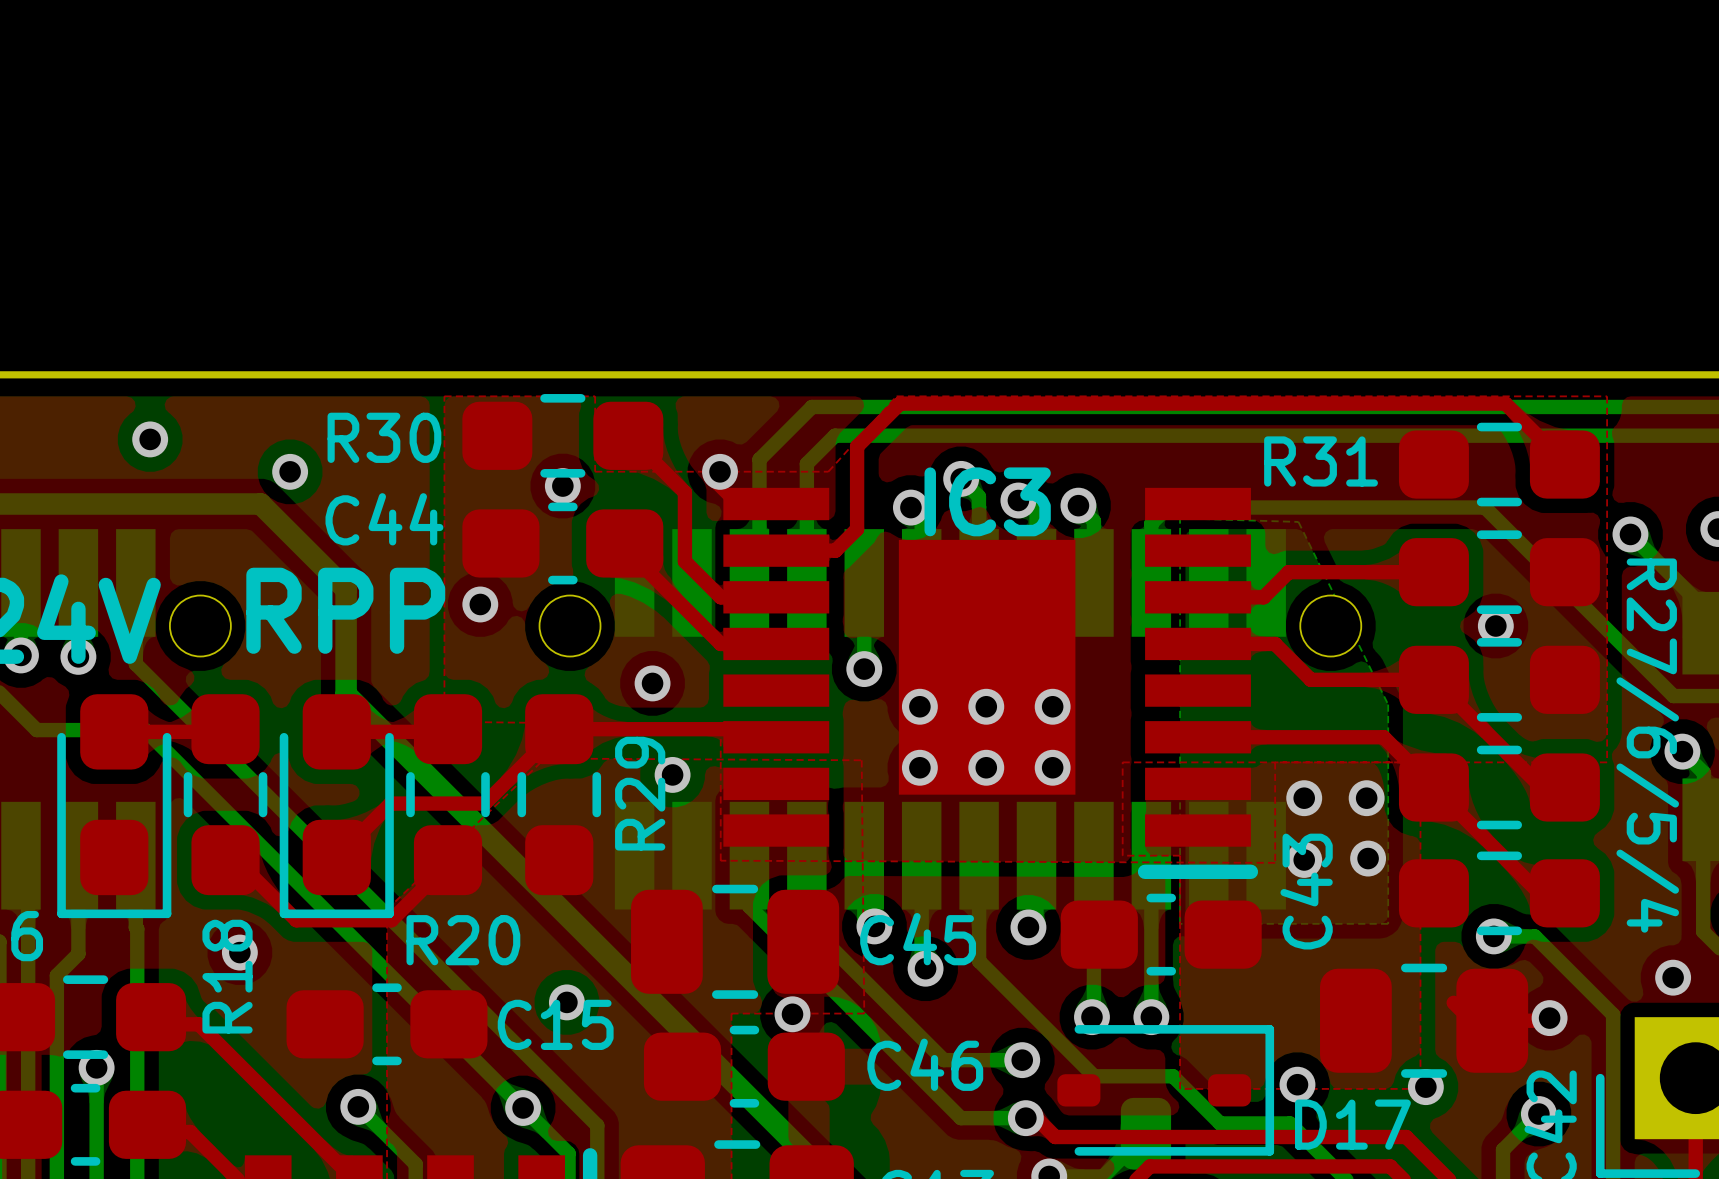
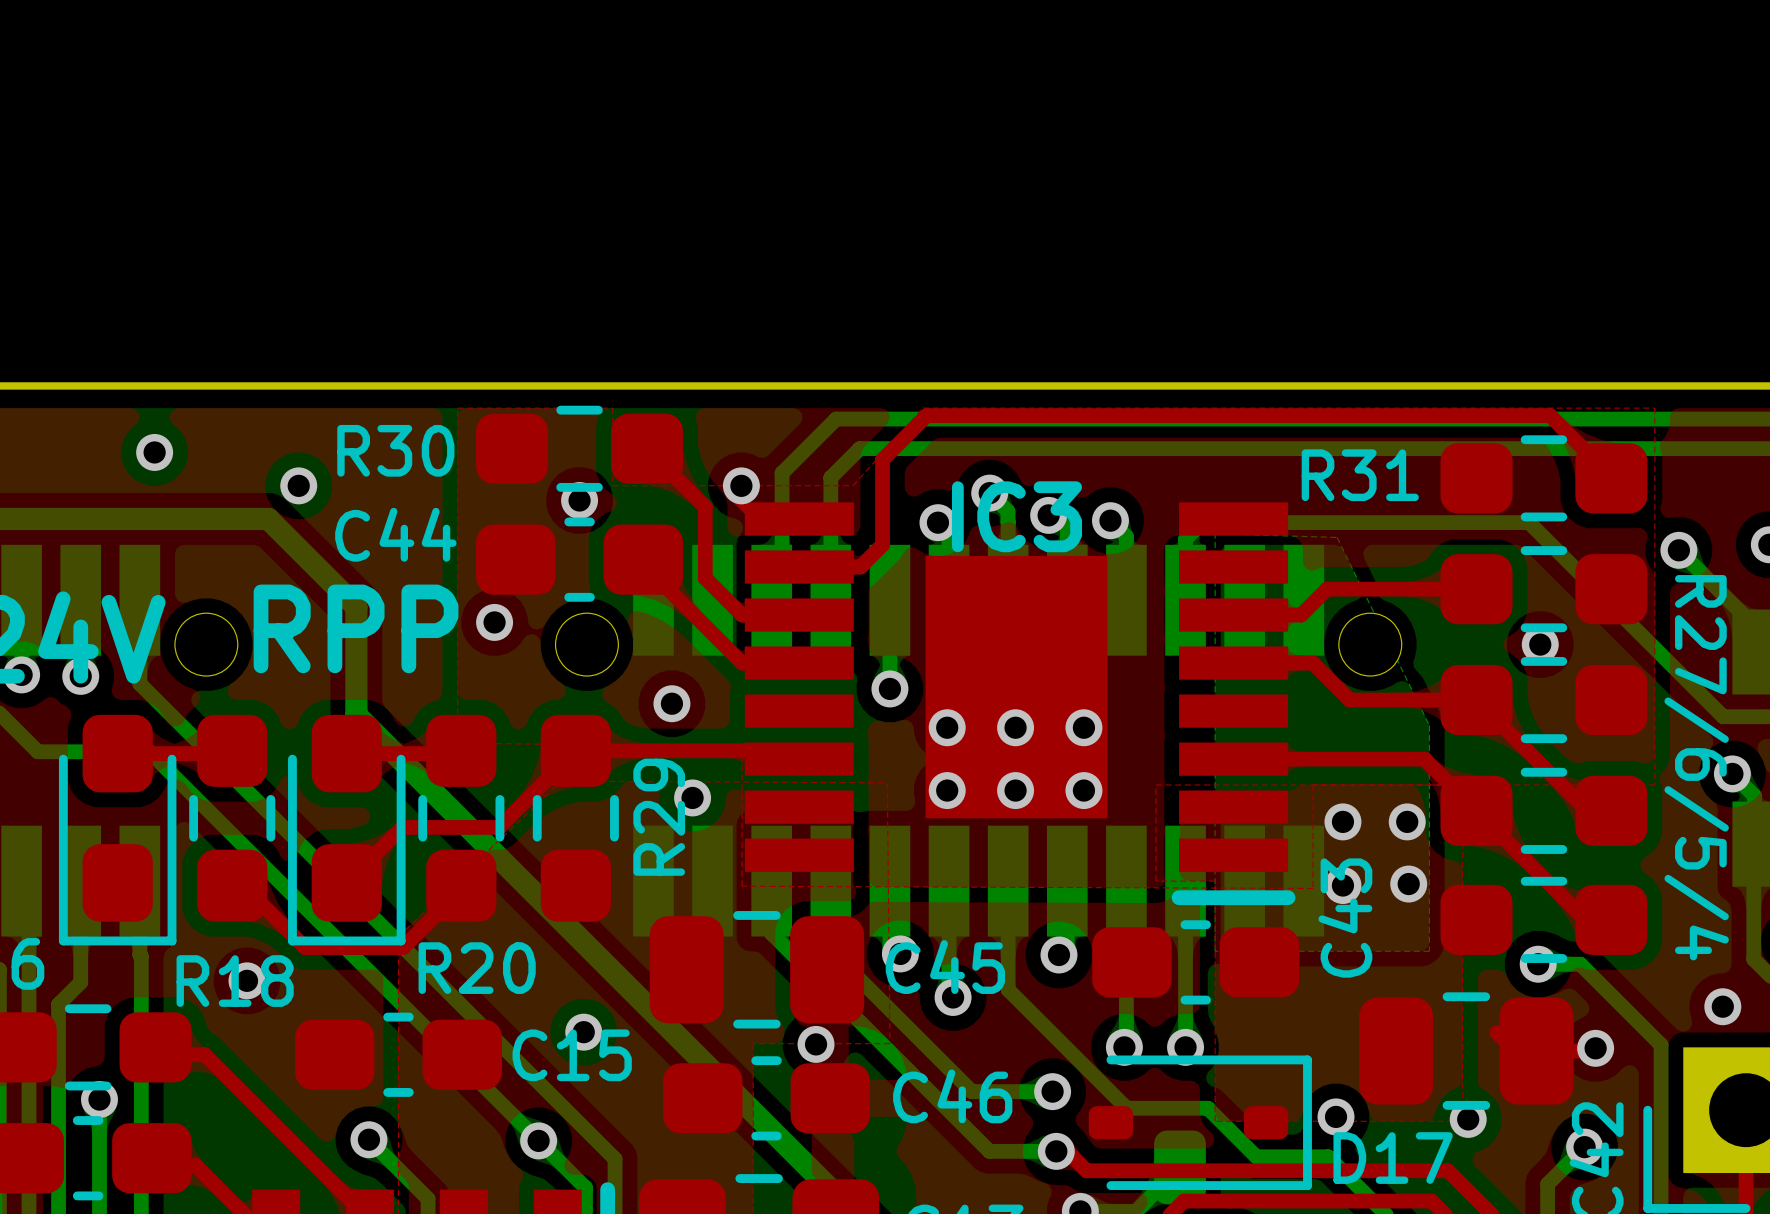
R18 name rotation: 0° (227, 976) -> 90° clockwise (235, 981)

